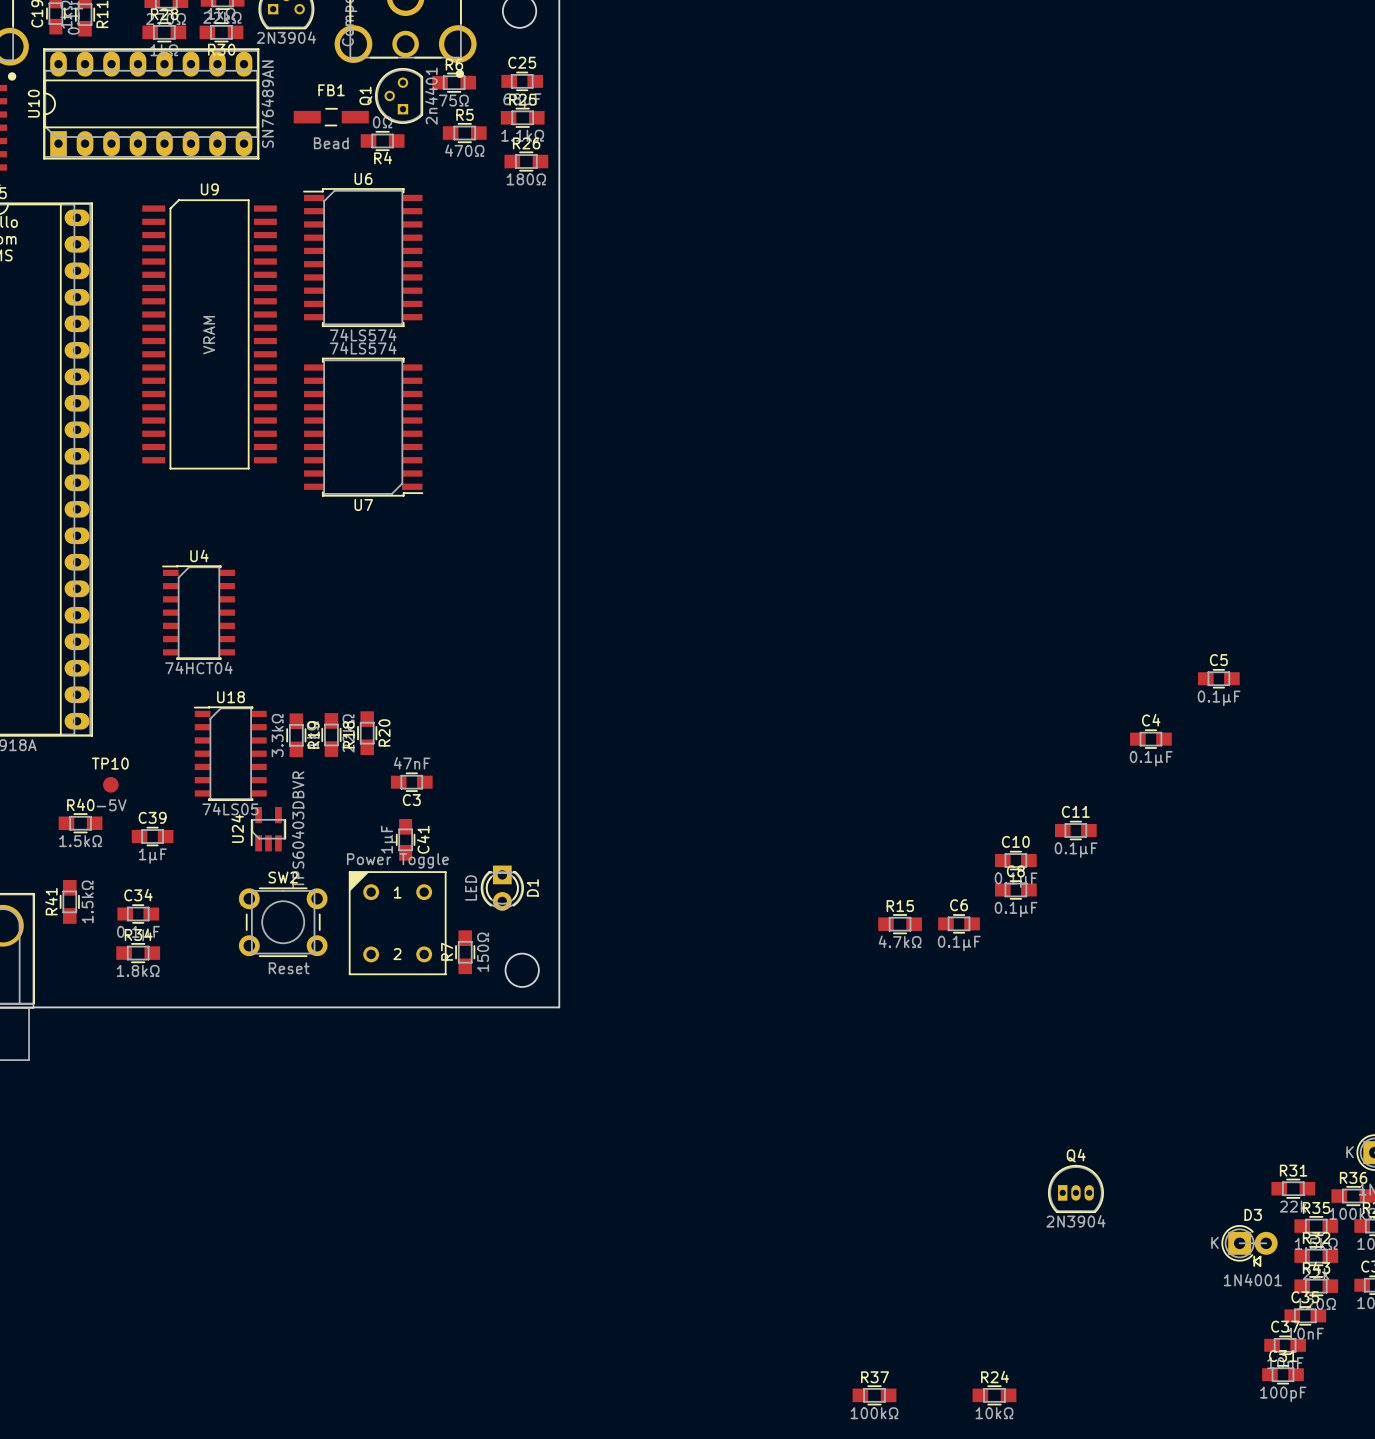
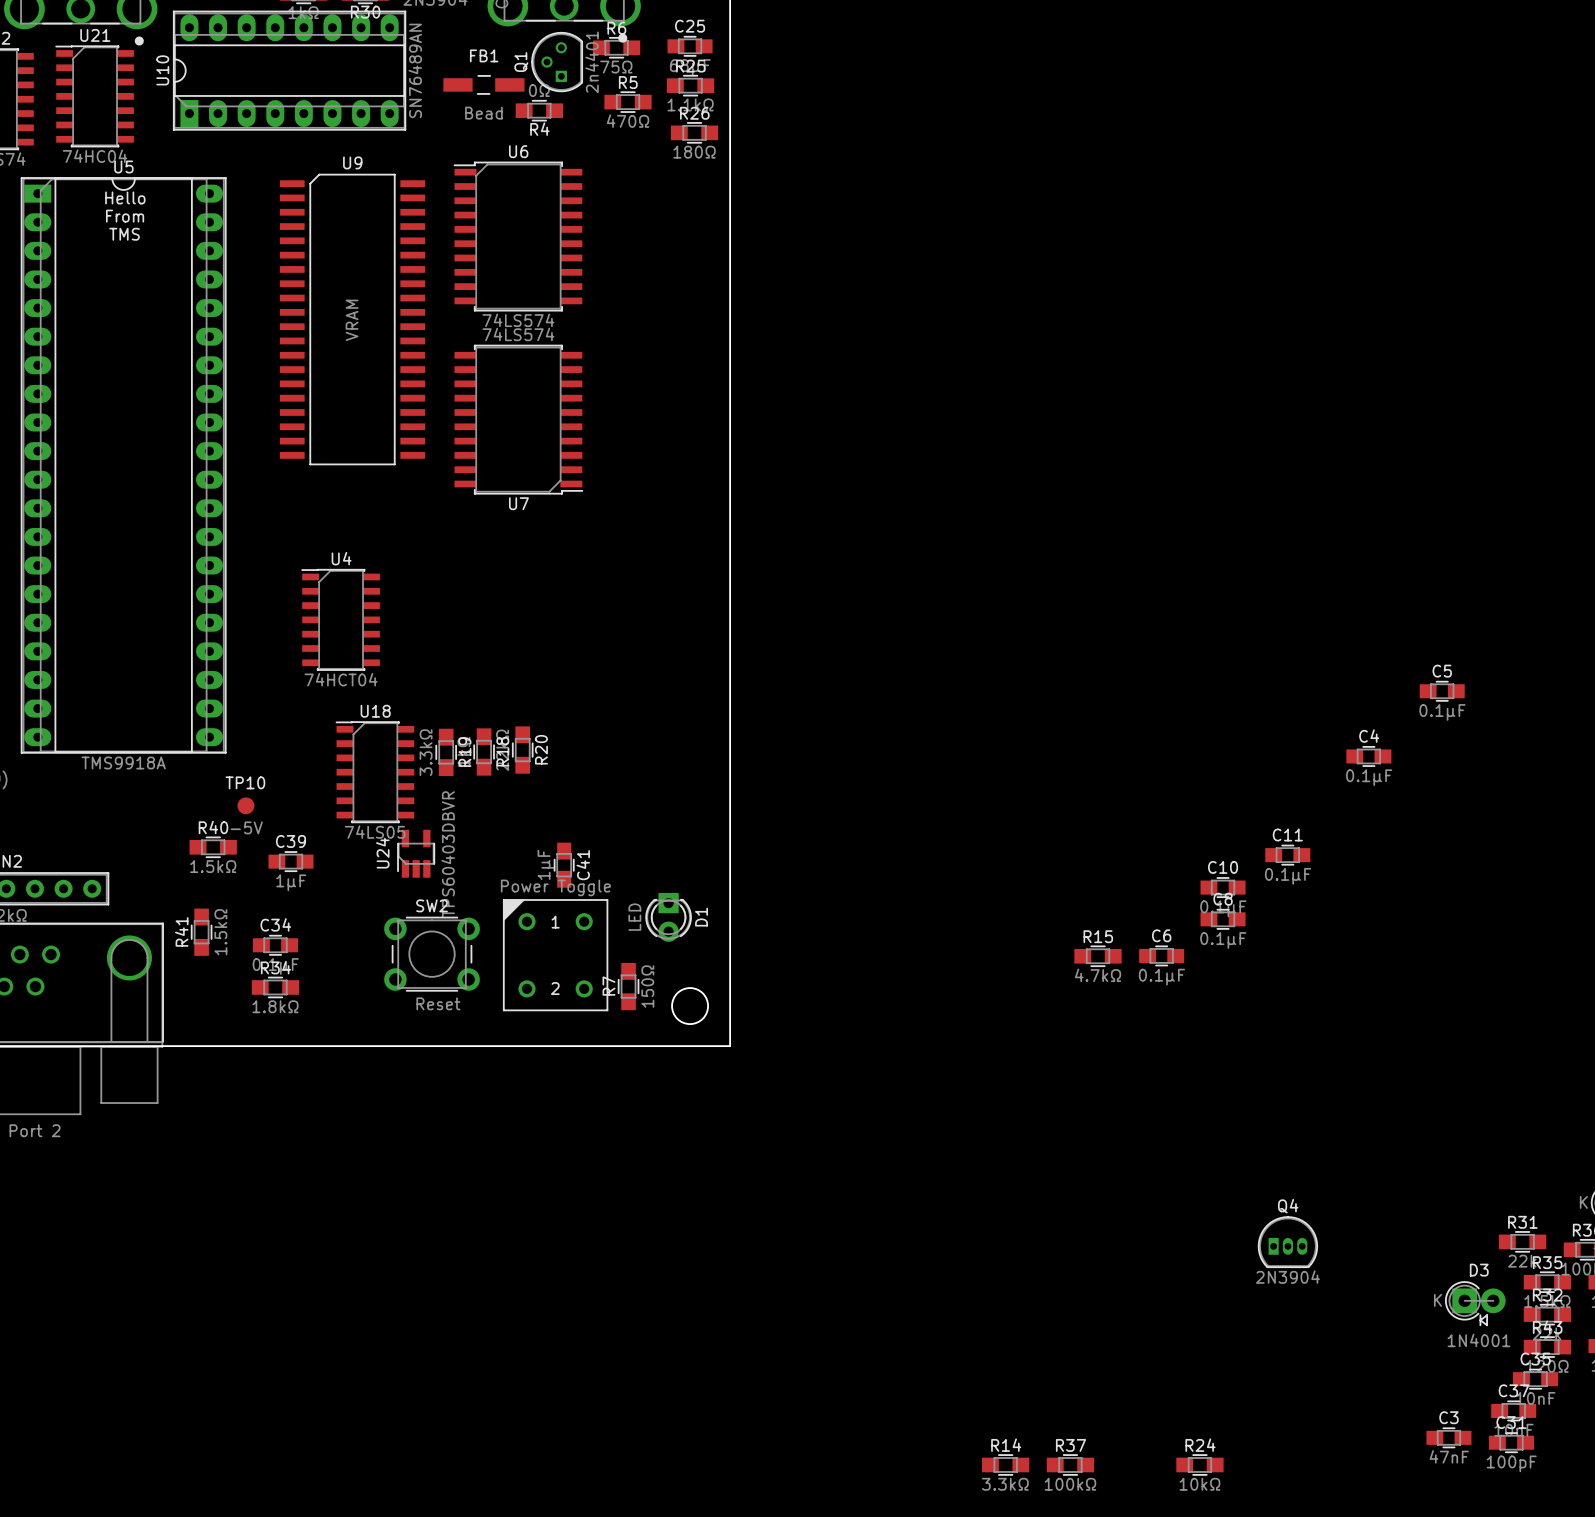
C3 value position: 47nF (412, 763) -> 47nF (1449, 1456)
C3 position: (411, 782) -> (1448, 1437)
C3 name position: C3 (411, 800) -> C3 (1448, 1417)
R14: none -> 3.3kΩ (1005, 1464)

